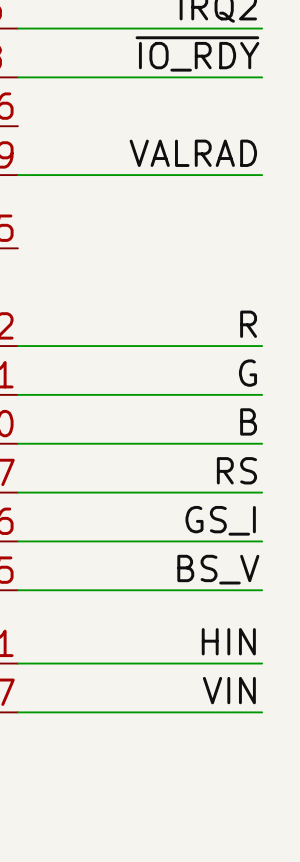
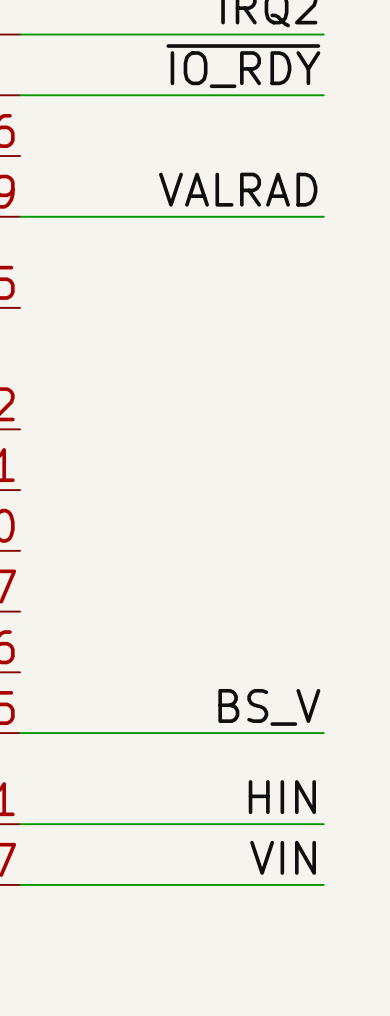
label: R (248, 324) -> none
wire: (17, 346) (262, 346) -> none
label: G (247, 373) -> none
wire: (17, 394) (262, 394) -> none
label: B (248, 421) -> none
wire: (17, 443) (262, 443) -> none
label: RS (236, 470) -> none
wire: (17, 492) (262, 492) -> none
label: GS_I (220, 520) -> none
wire: (17, 541) (262, 541) -> none

